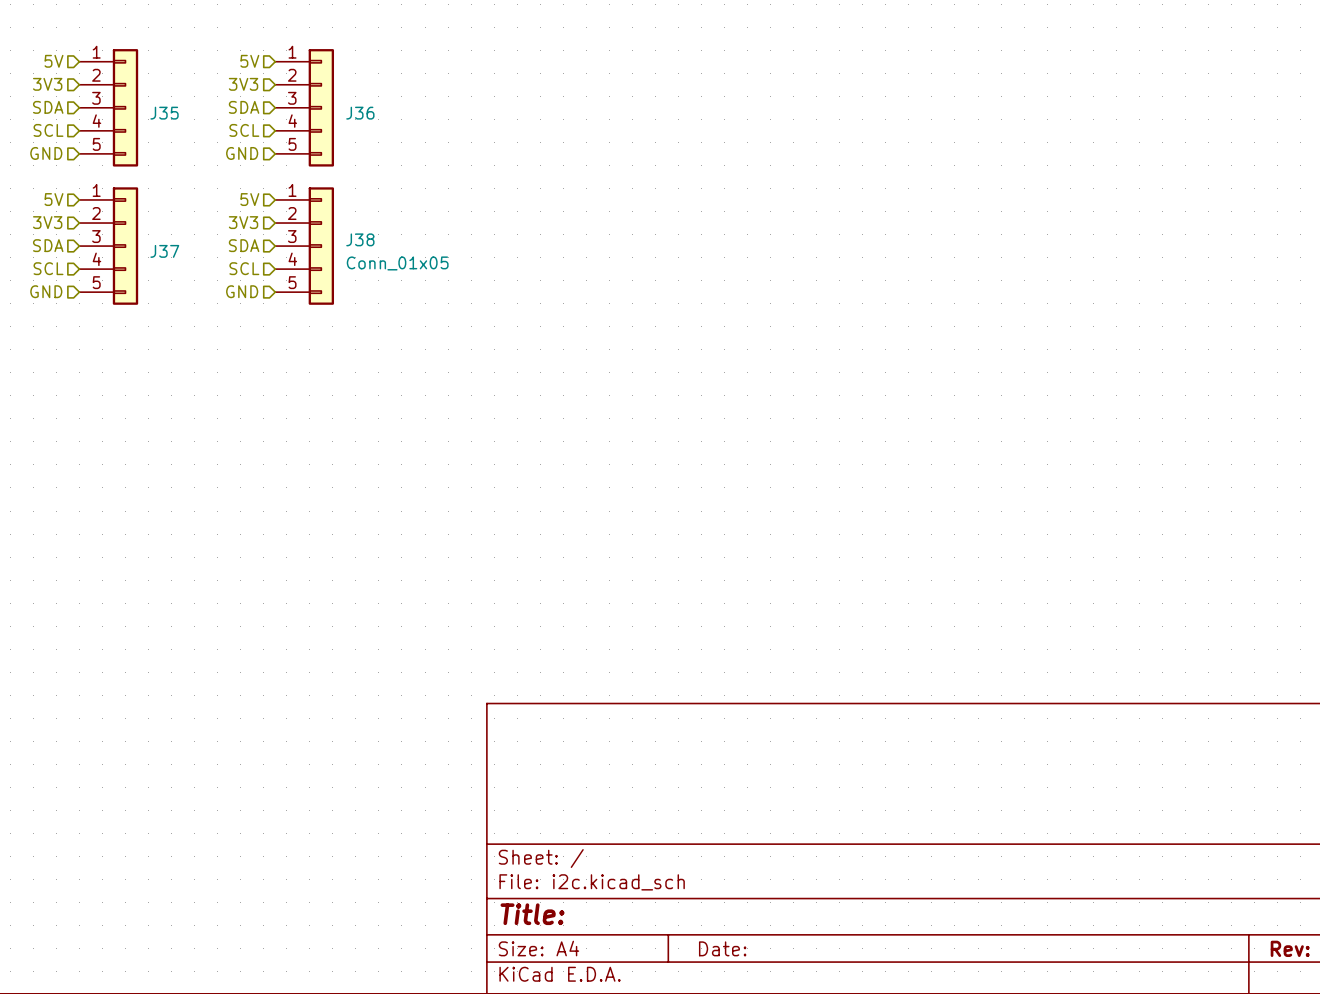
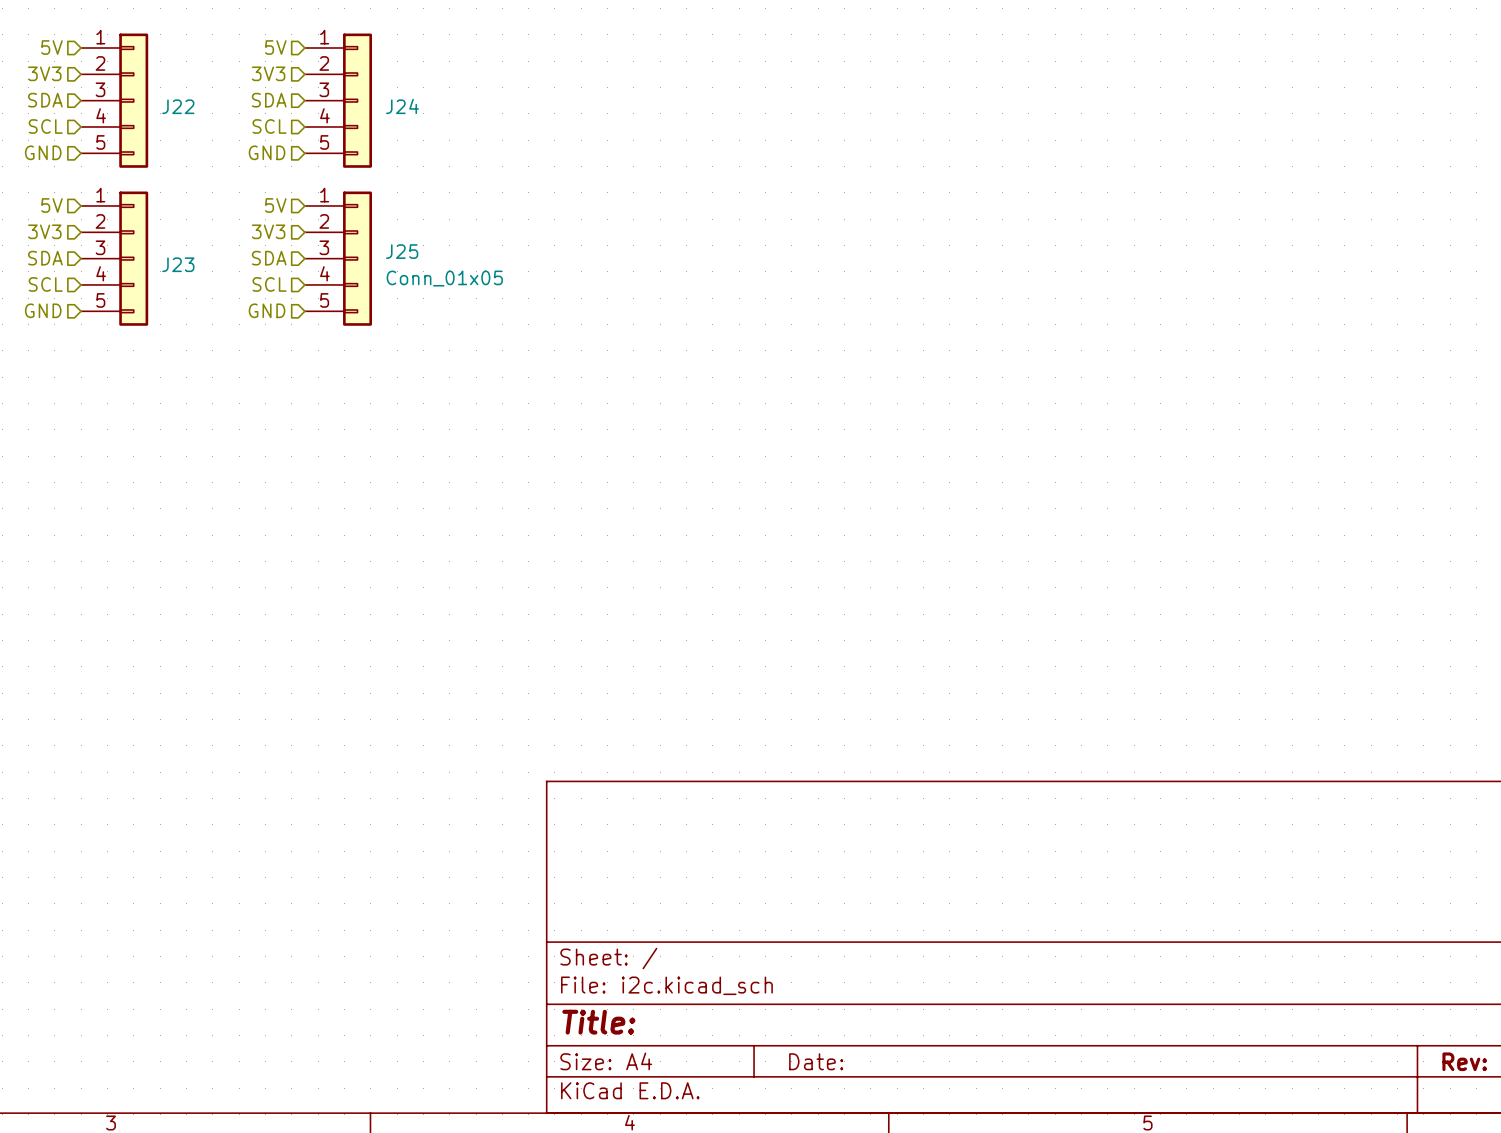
J35 name: J35 (164, 113) -> J22 (178, 106)
J36 name: J36 (360, 113) -> J24 (402, 106)
J38 name: J38 (360, 239) -> J25 (402, 251)
J37 name: J37 (164, 251) -> J23 (178, 264)

